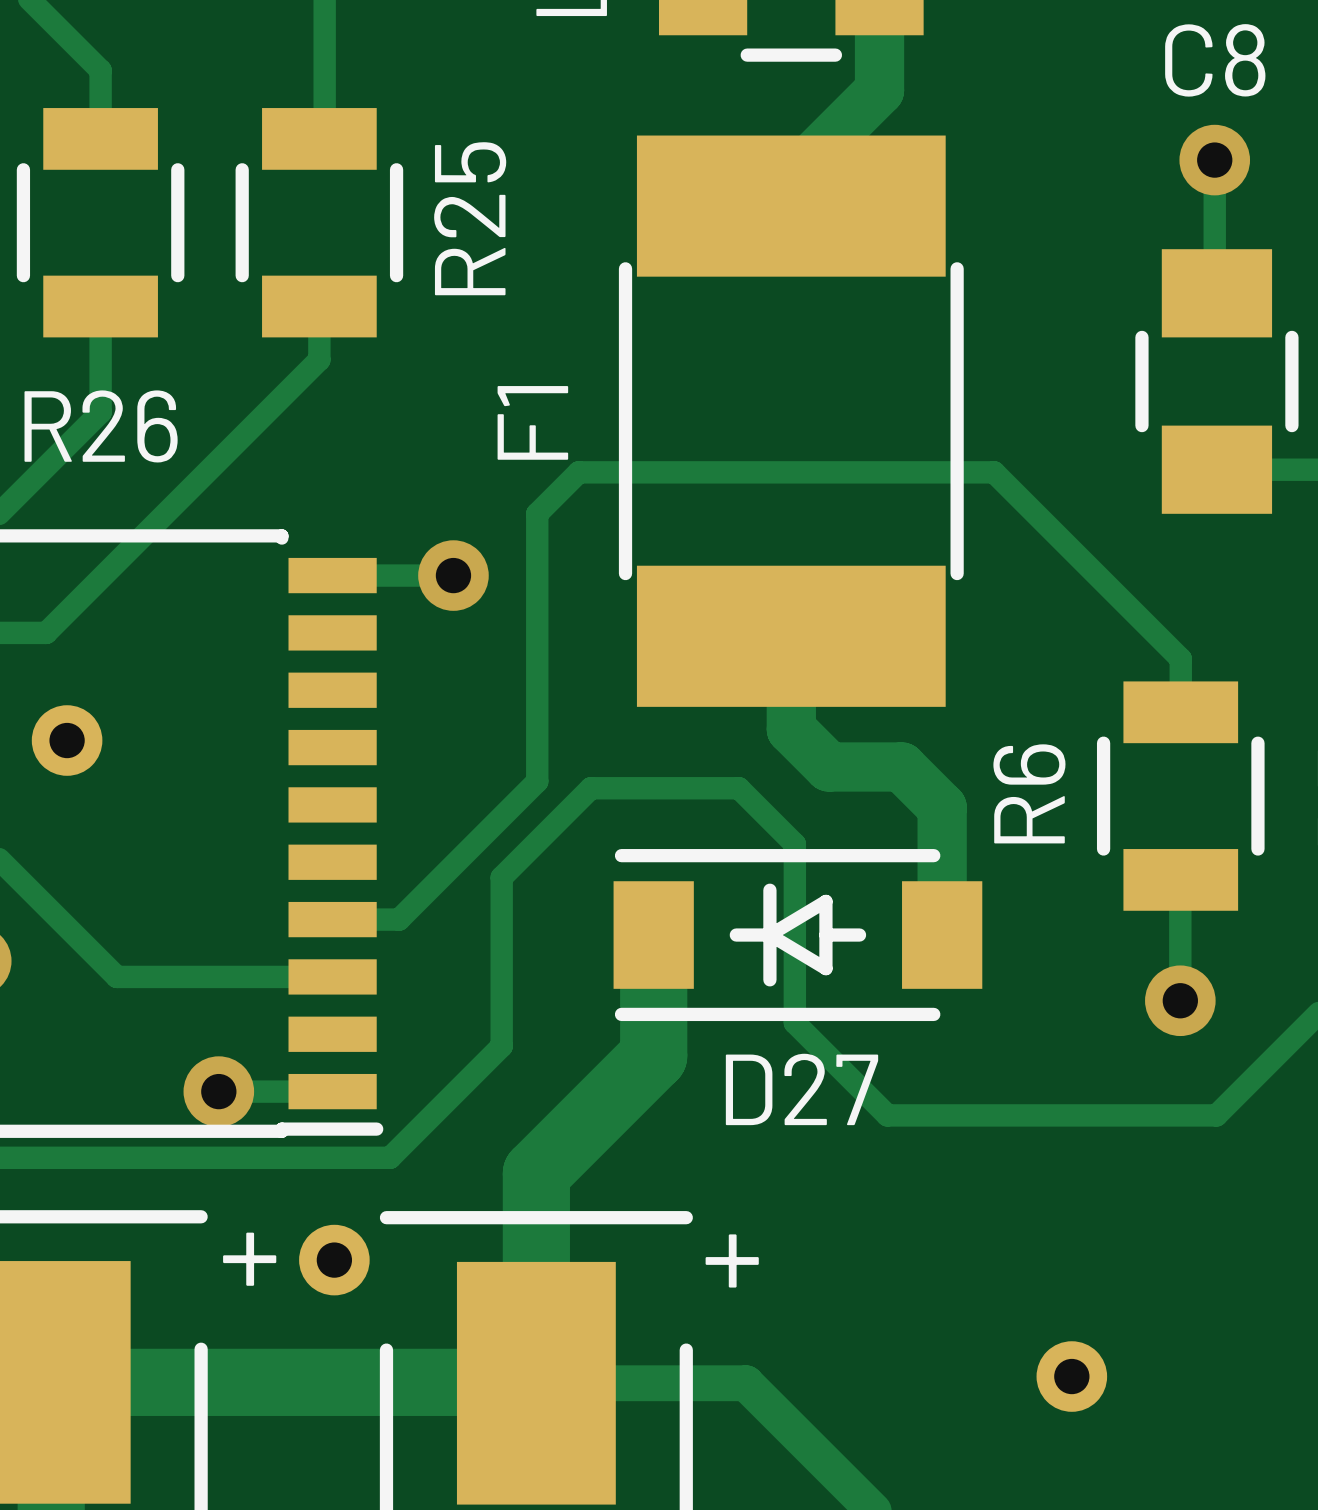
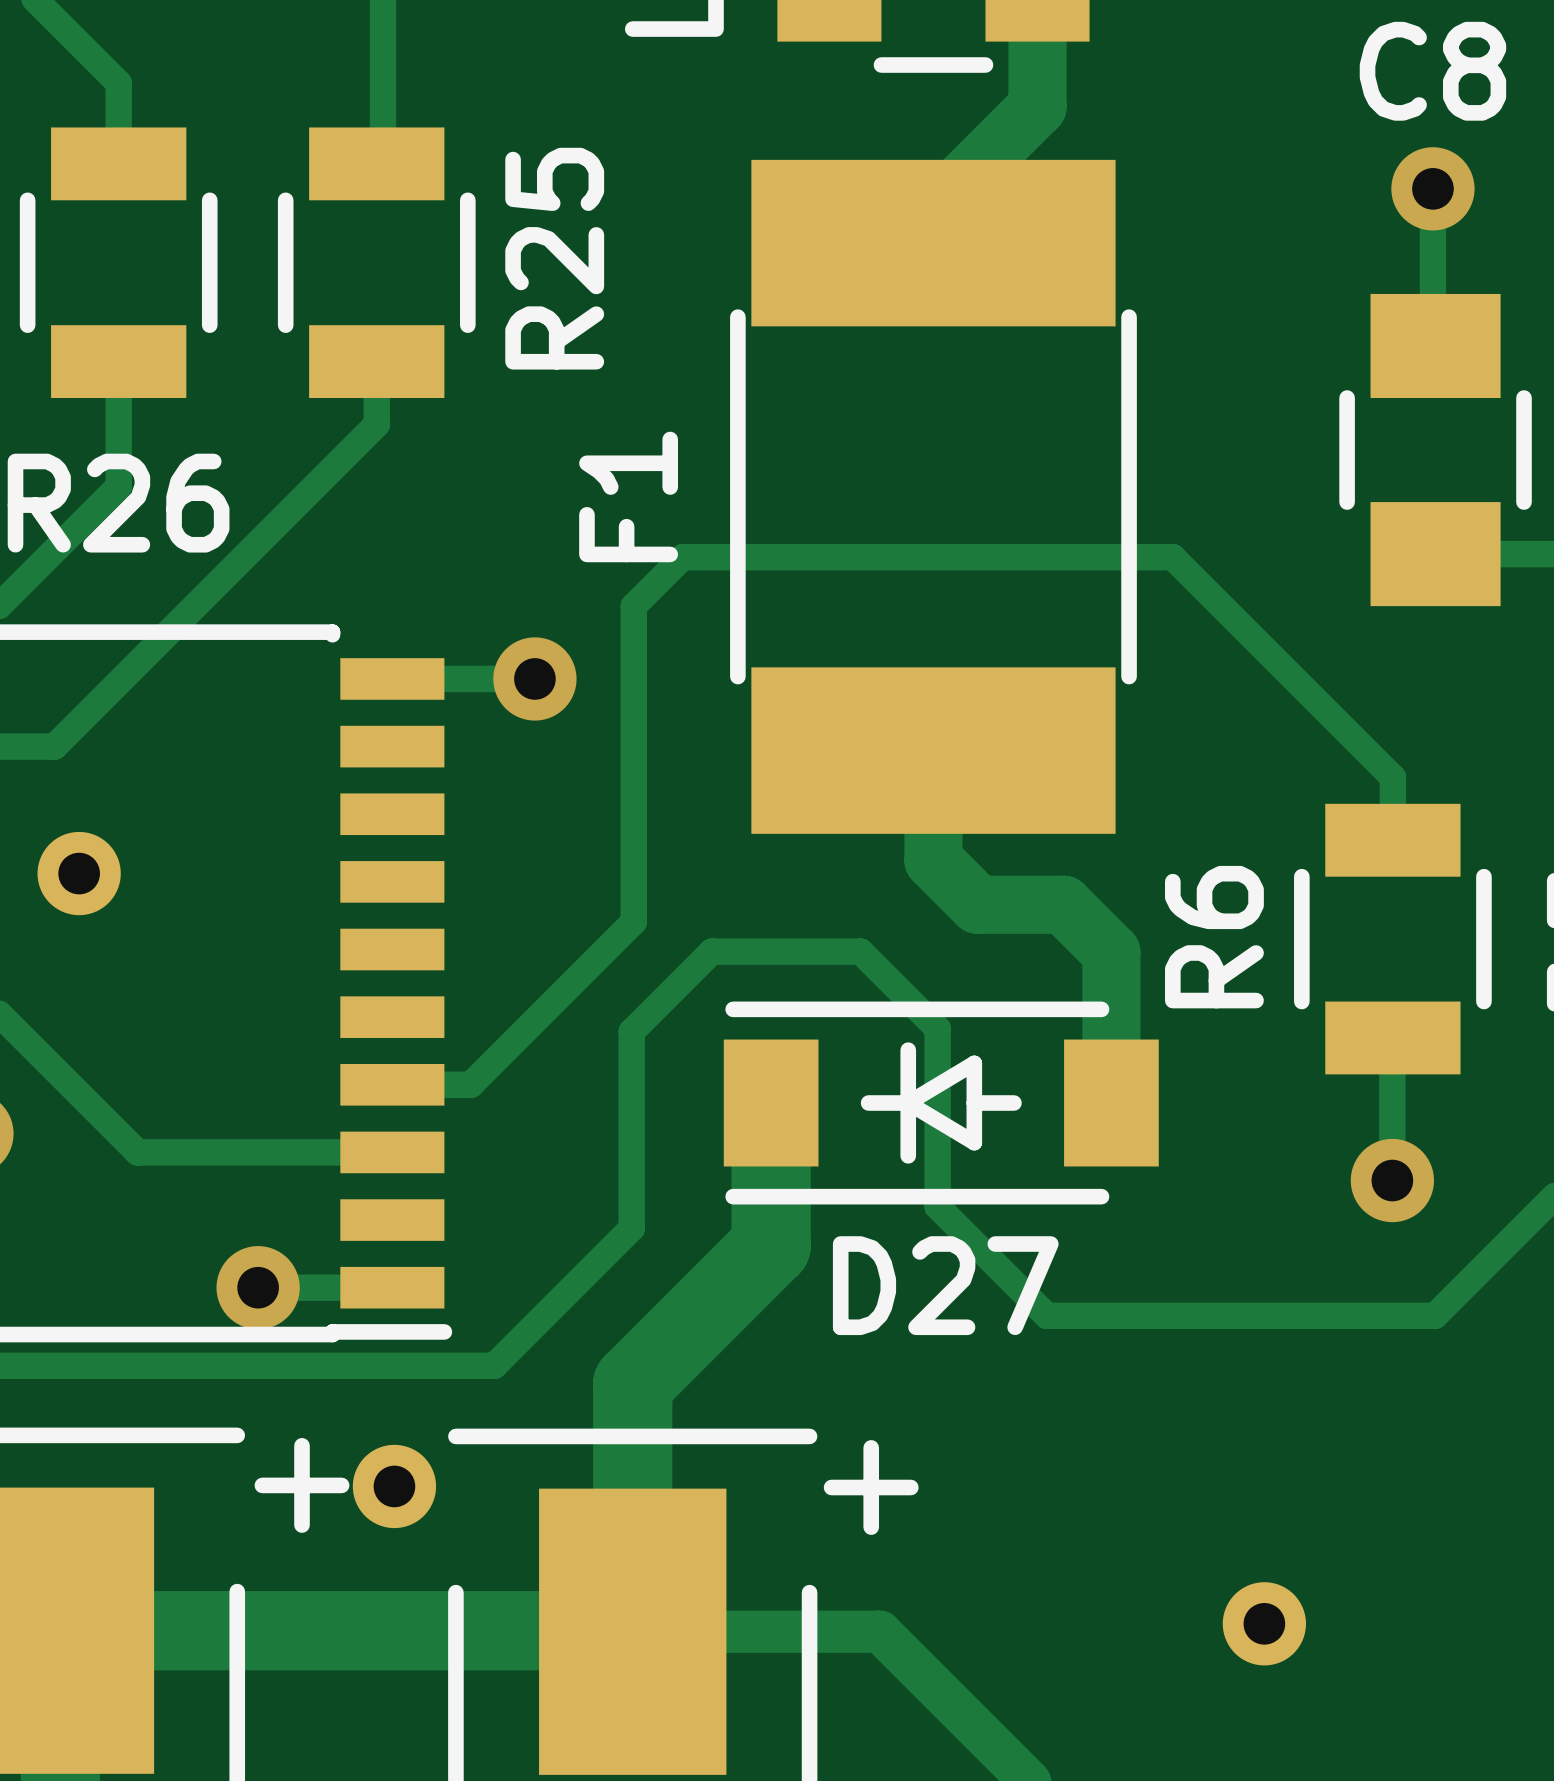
track: (794, 871) (794, 844) (738, 788) (590, 788) (501, 877) (501, 1046) (390, 1157) -> (937, 1028) (860, 951) (711, 951) (631, 1031) (631, 1228) (494, 1365) (460, 1365)

